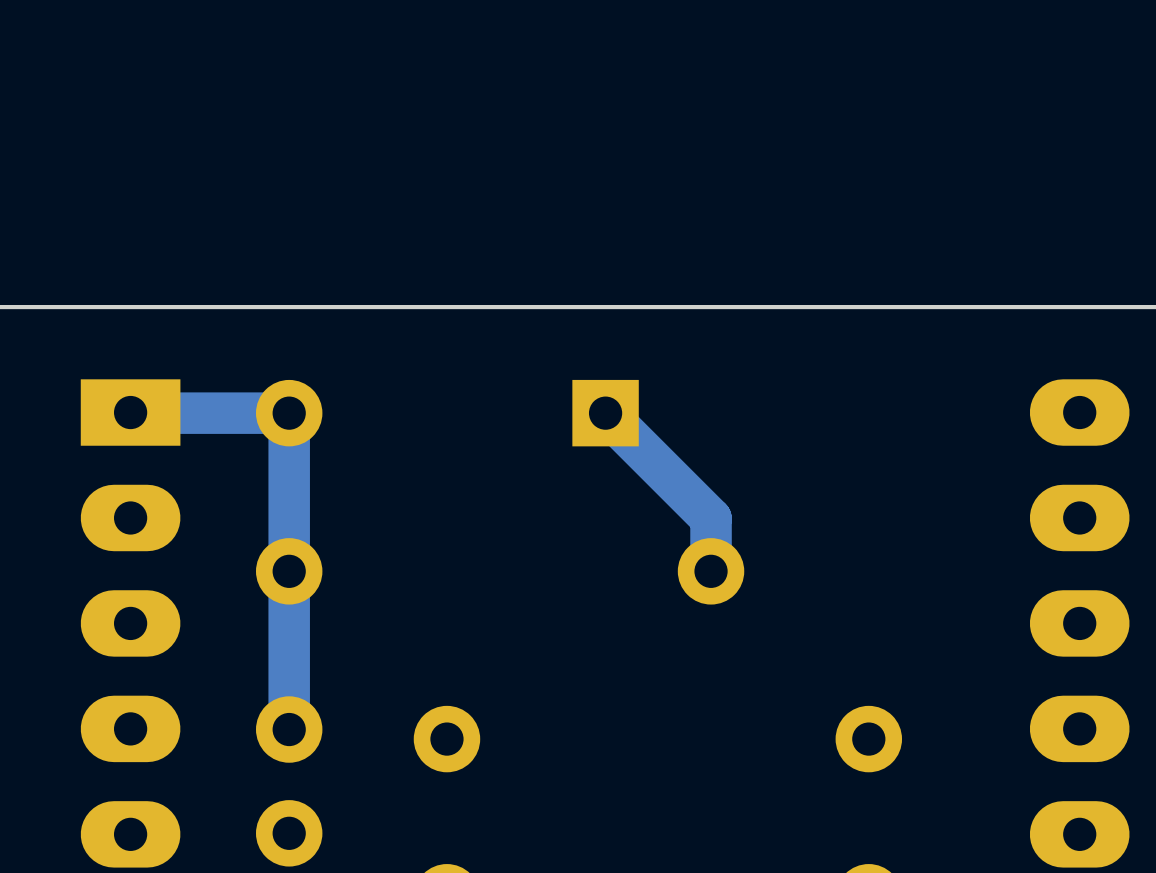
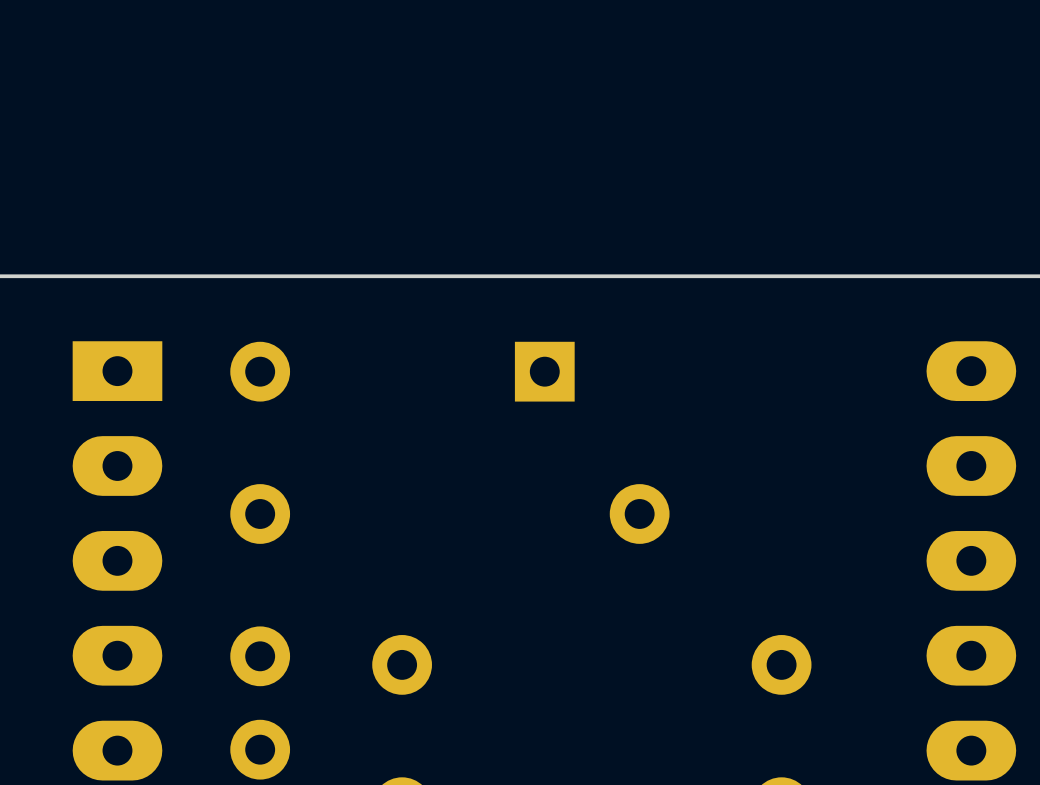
track: (130, 412) (289, 413) (289, 729) -> none
track: (605, 413) (711, 518) (711, 571) -> none

